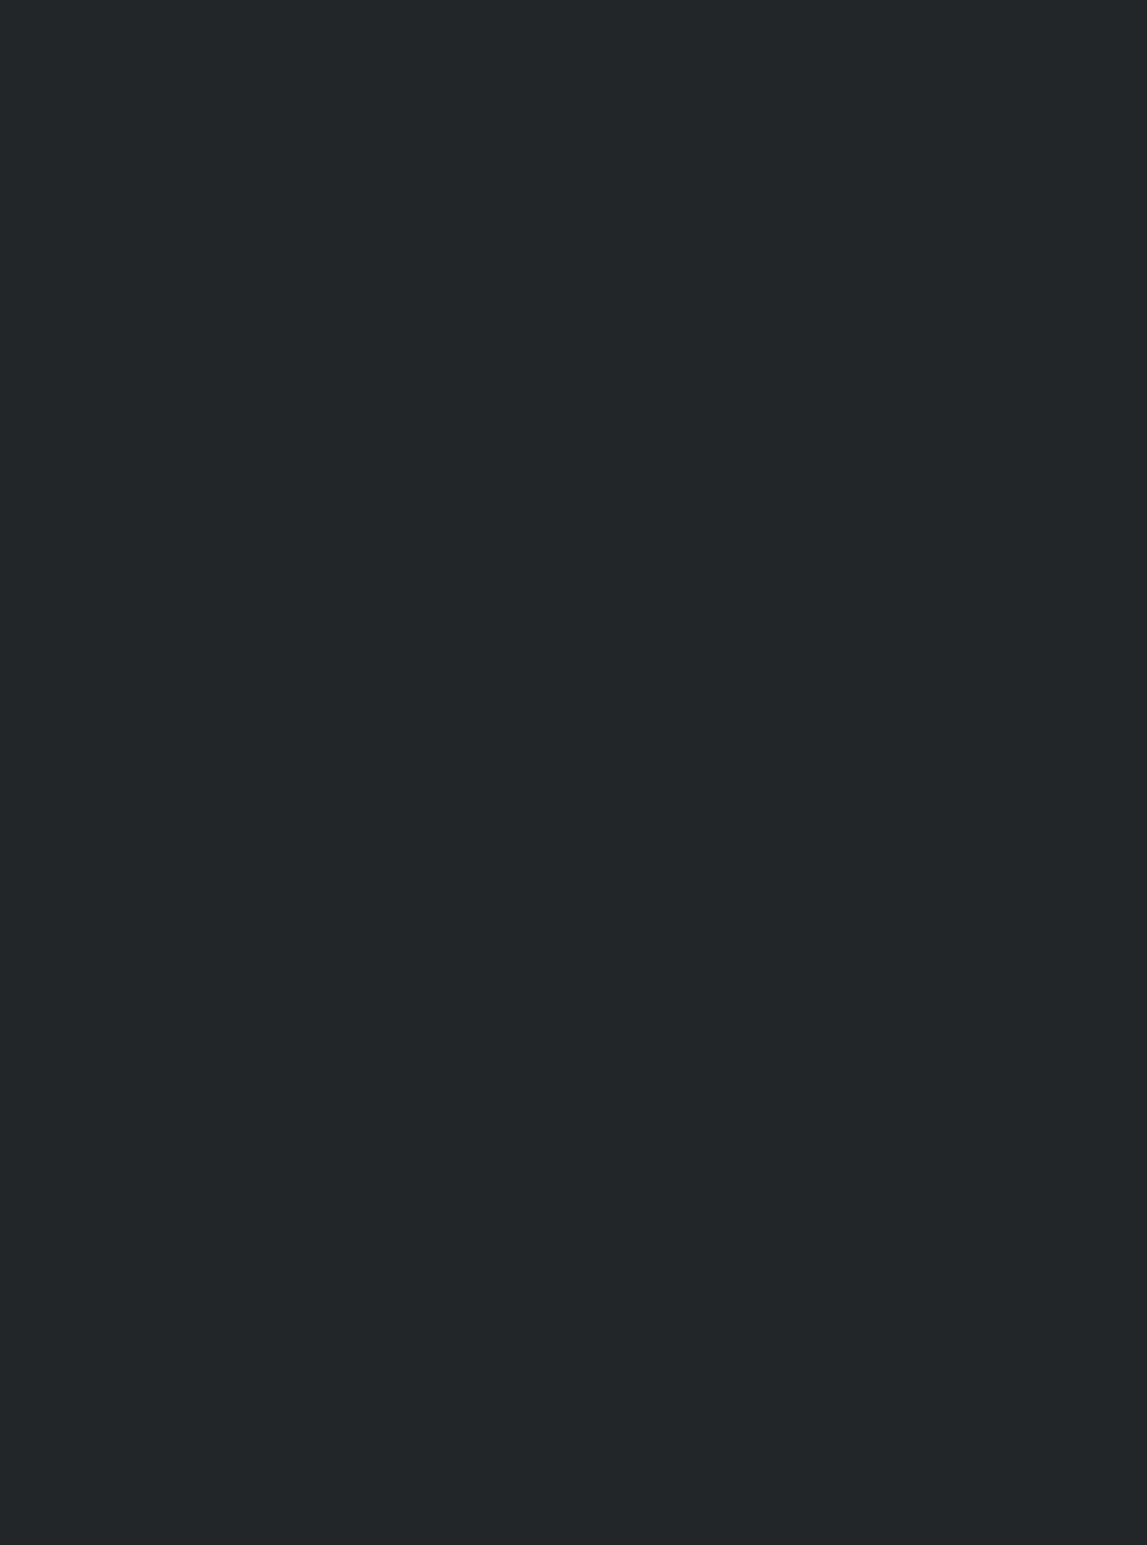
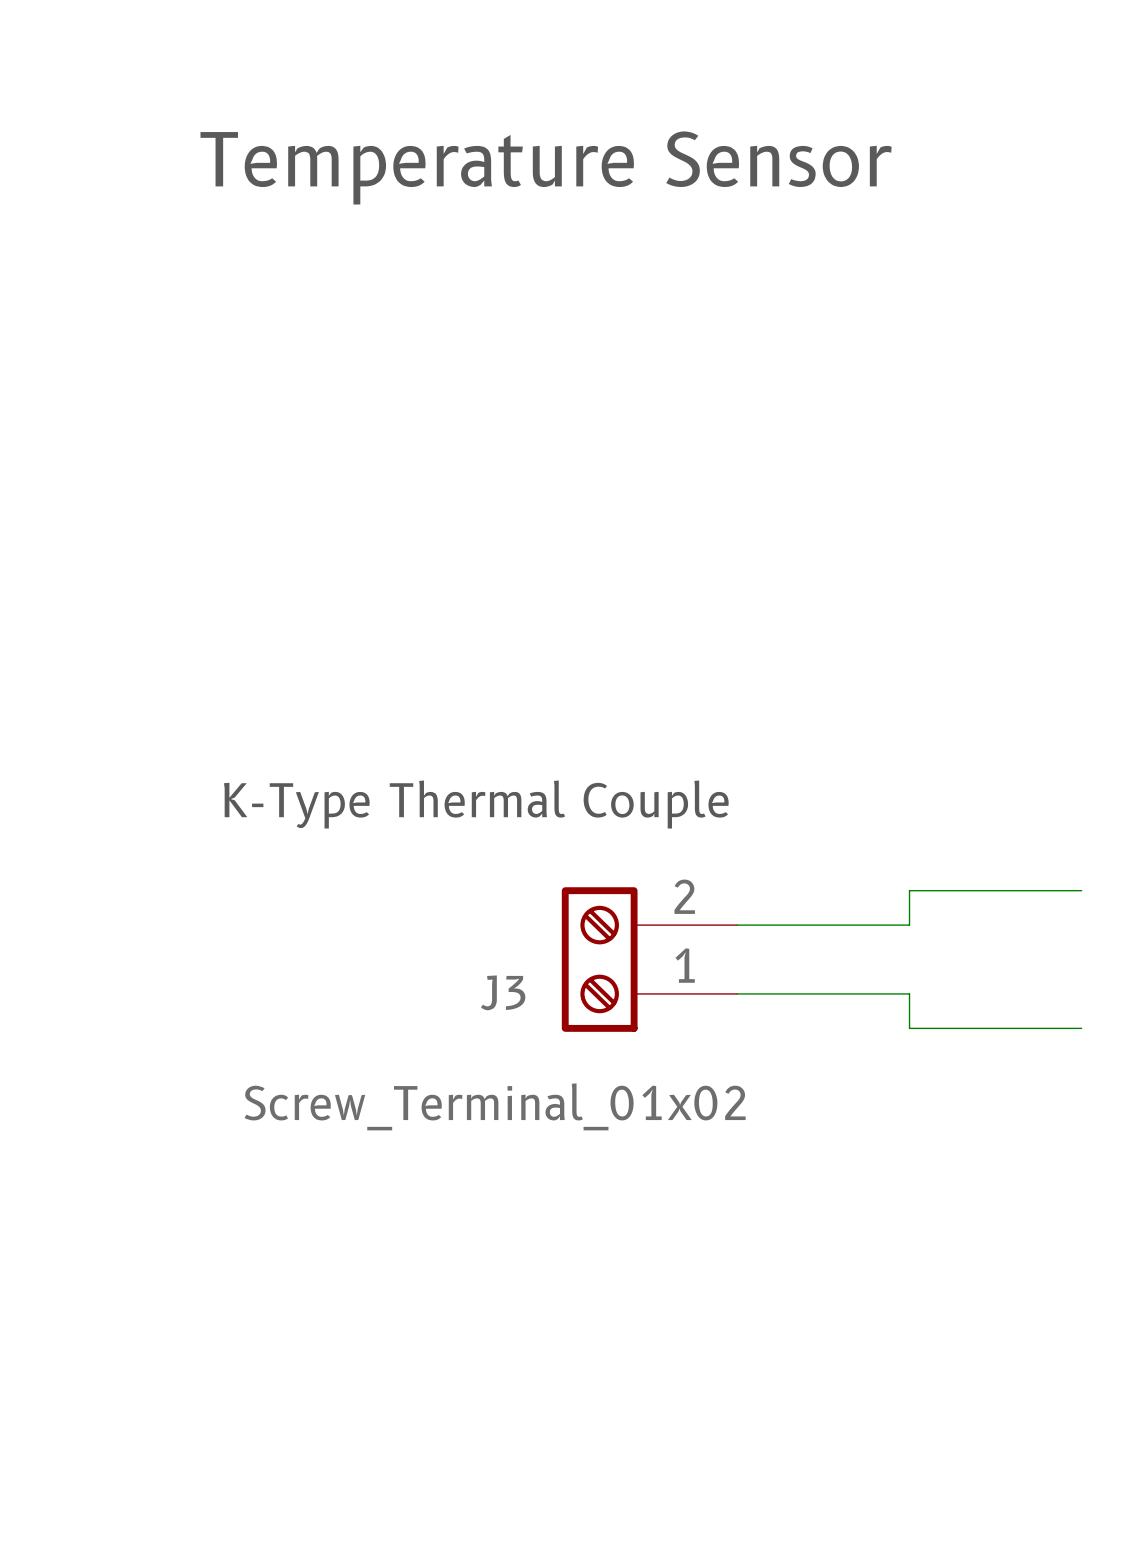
text: none -> Temperature Sensor (546, 167)
text: none -> K-Type Thermal Couple (476, 804)
wire: none -> (1081, 890) (909, 890) (909, 925) (737, 925)
J3: none -> Screw_Terminal_01x02 (649, 959)
wire: none -> (737, 993) (909, 993) (909, 1028) (1081, 1028)

